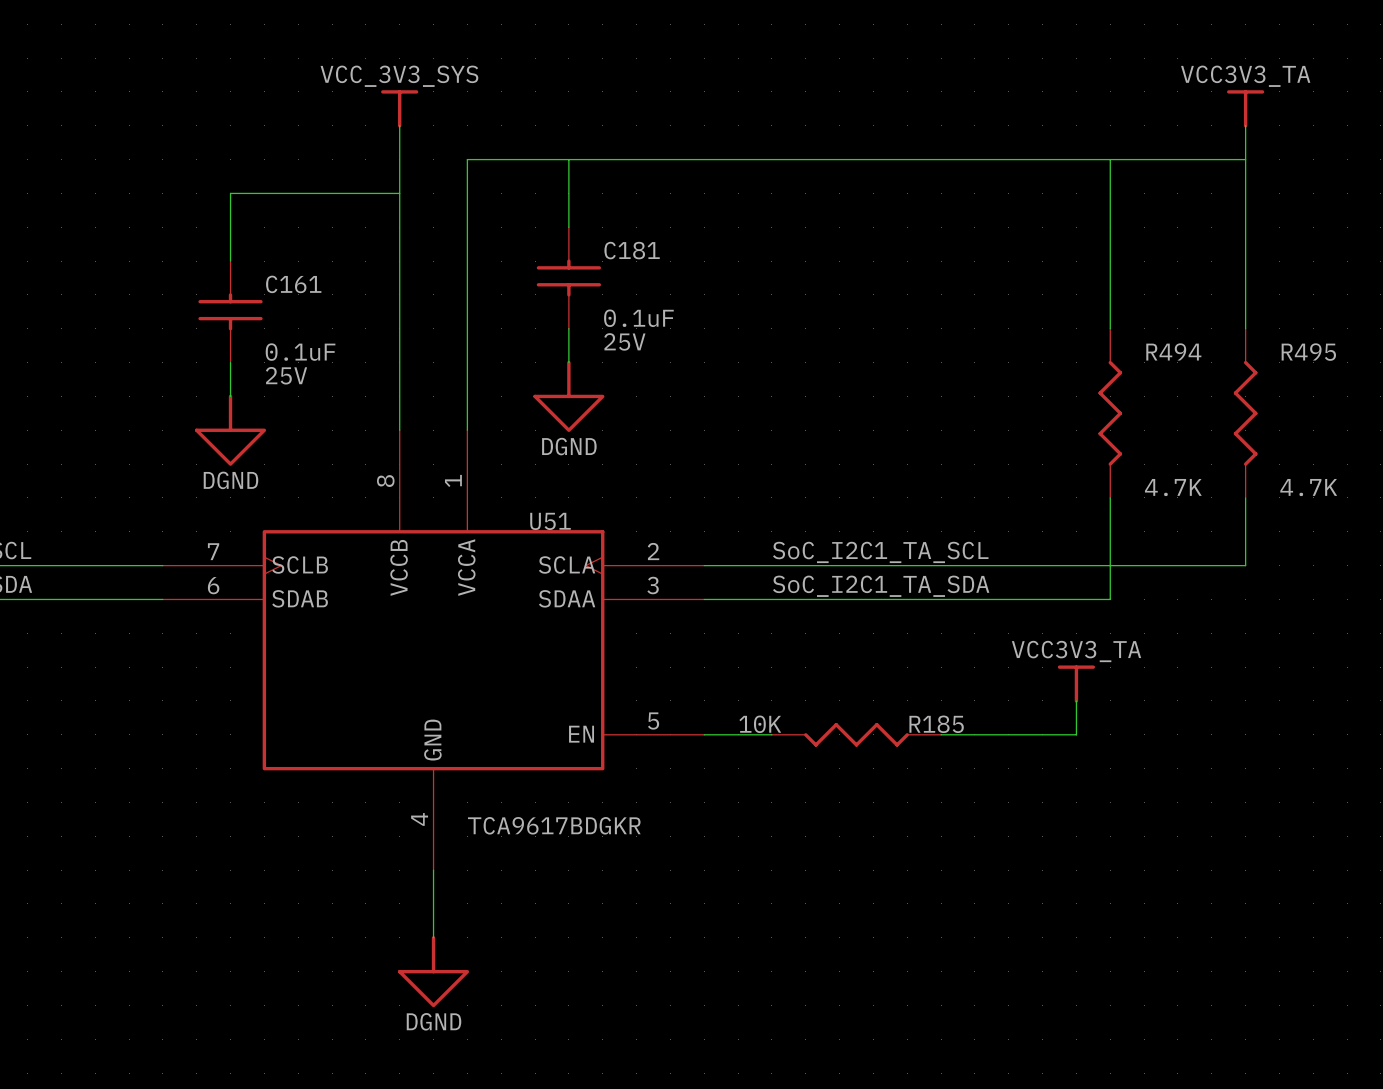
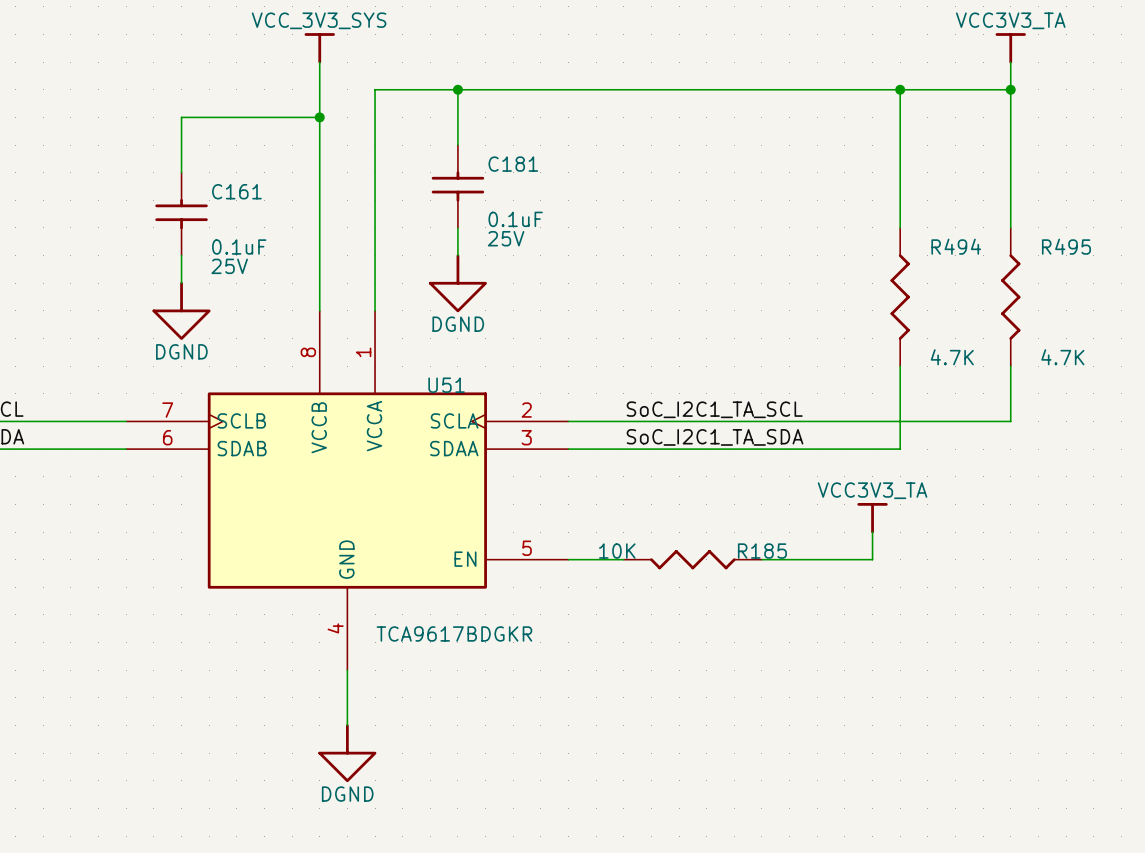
junction: none -> (457, 89)
junction: none -> (900, 89)
junction: none -> (1010, 89)
junction: none -> (319, 117)

